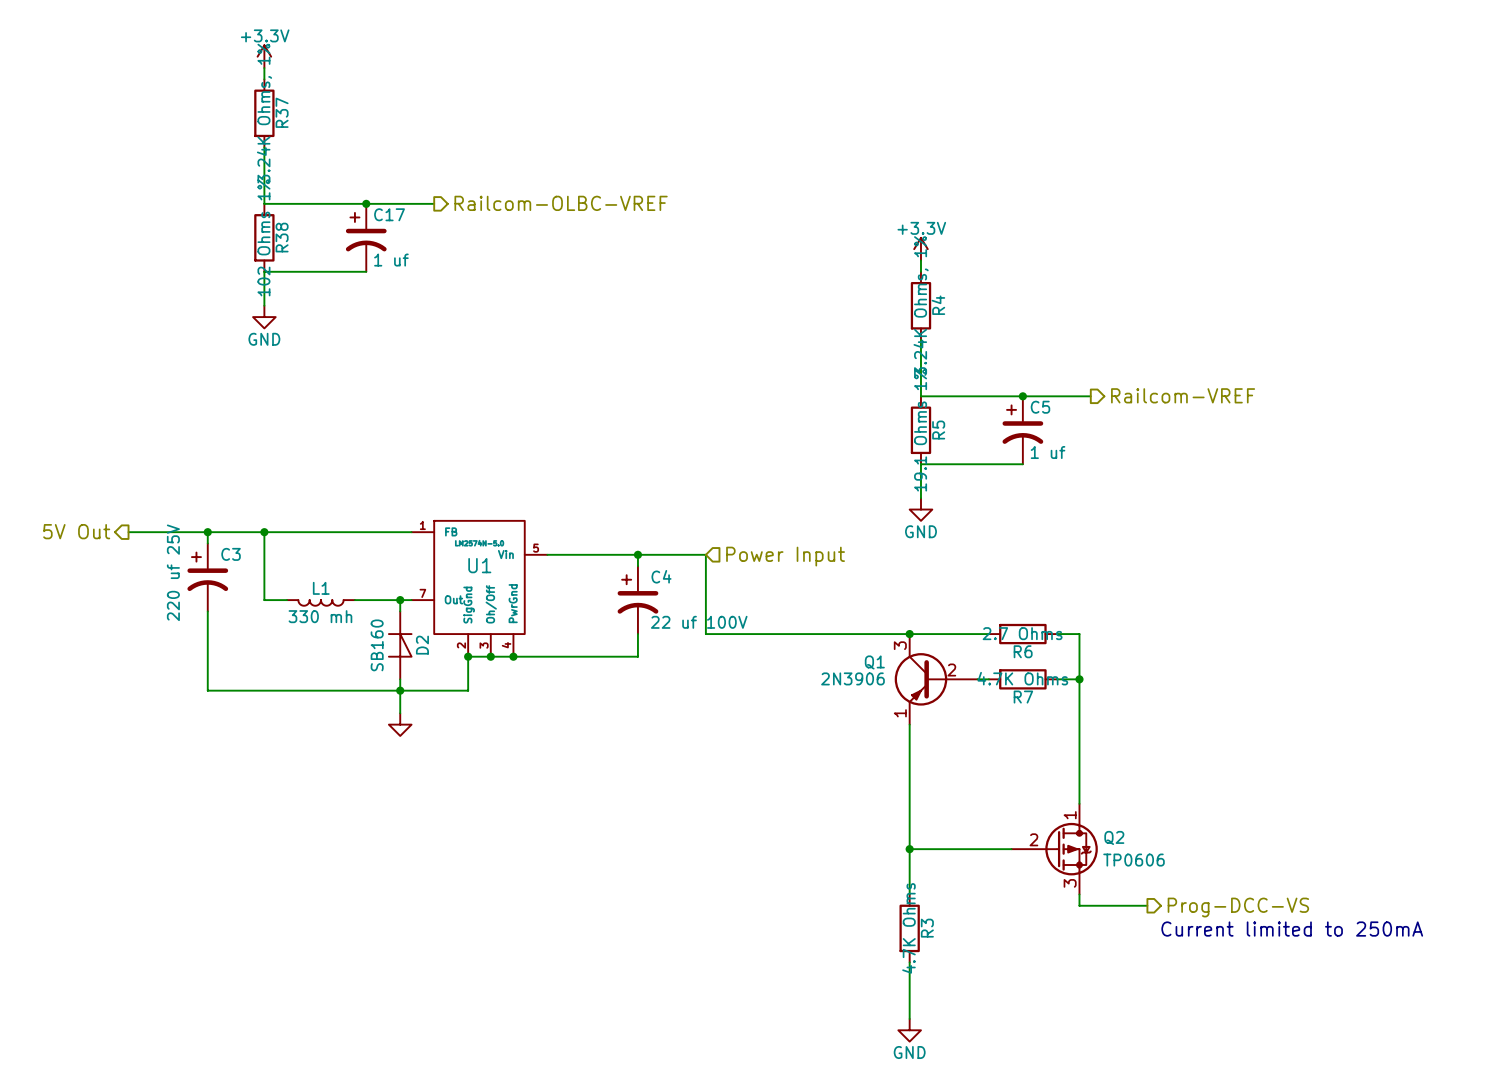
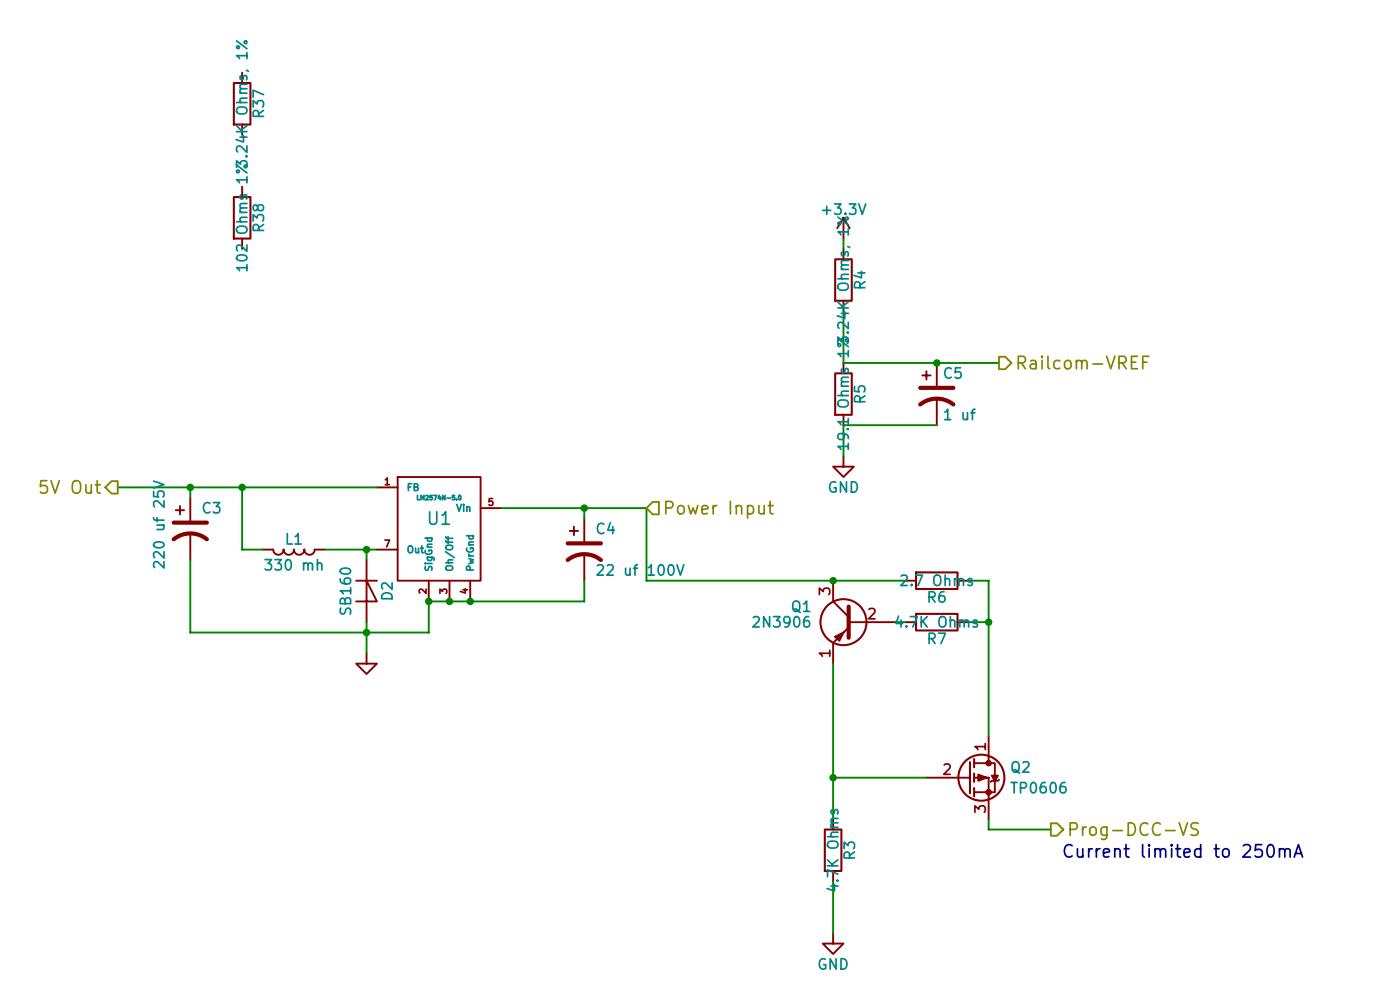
power symbol: +3.3V (264, 56) -> none
wire: (264, 68) (264, 79) -> none
wire: (264, 147) (264, 203) (434, 203) -> none
junction: (366, 203) -> none
hierarchical label: Railcom-OLBC-VREF (561, 203) -> none
C17: 1 uf (366, 237) -> none
wire: (366, 271) (264, 271) (264, 305) -> none
power symbol: GND (264, 317) -> none

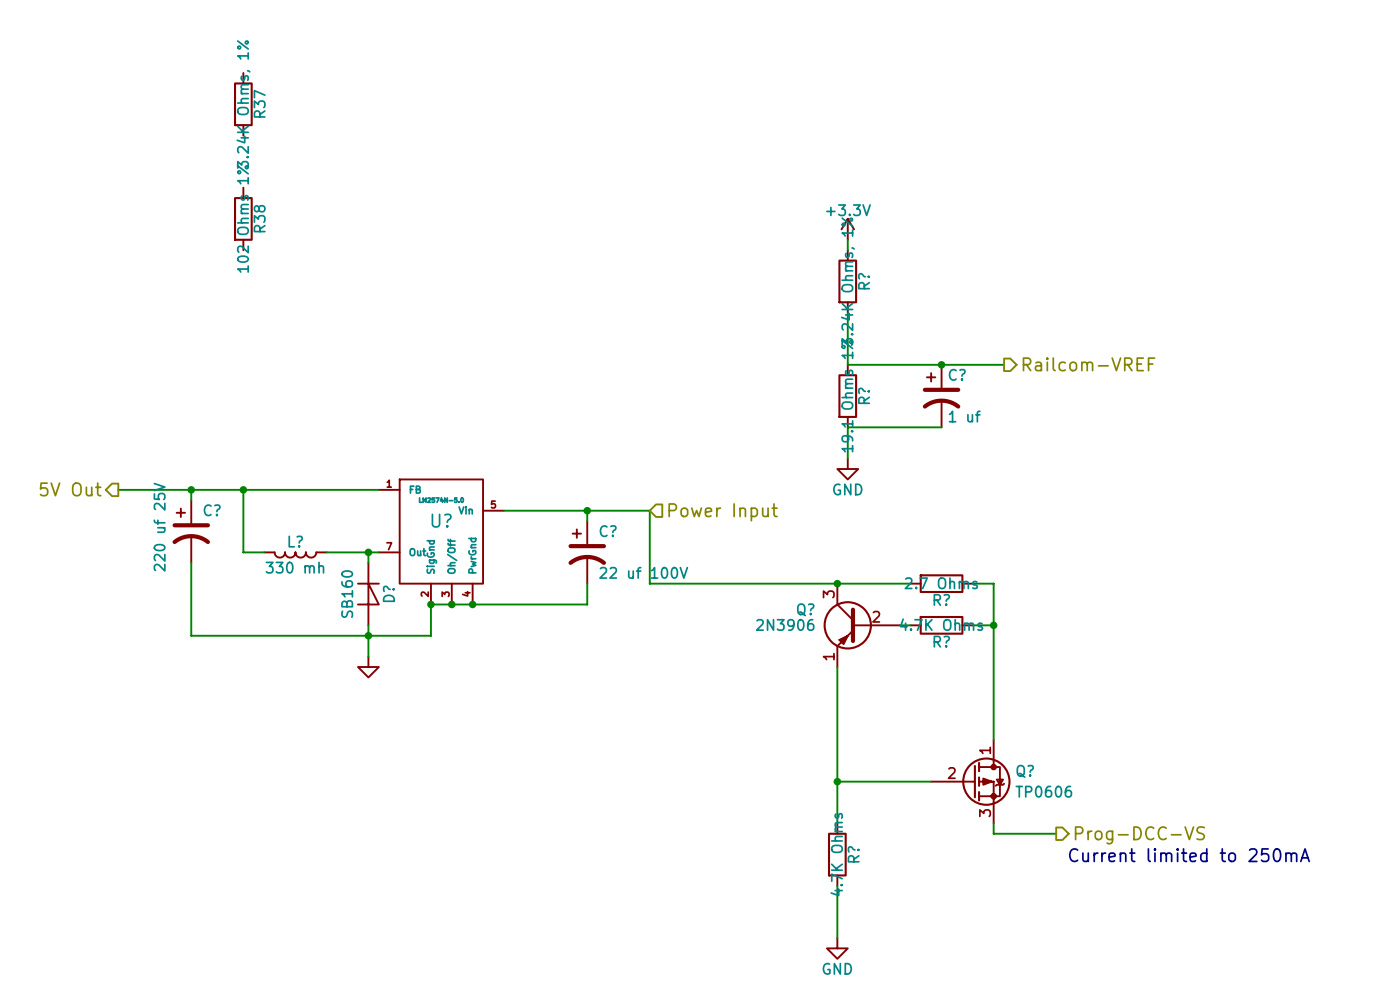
R4 name: R4 (859, 279) -> R? (864, 281)
C5 name: C5 (952, 372) -> C? (957, 374)
R5 name: R5 (859, 393) -> R? (864, 395)
C3 name: C3 (211, 507) -> C? (212, 510)
U1 name: U1 (439, 518) -> U? (441, 520)
C4 name: C4 (605, 528) -> C? (608, 531)
L1 name: L1 (294, 538) -> L? (295, 541)
D2 name: D2 (386, 590) -> D? (388, 593)
R6 name: R6 (937, 596) -> R? (941, 599)
Q1 name: Q1 (801, 606) -> Q? (805, 609)
R7 name: R7 (937, 638) -> R? (941, 641)
Q2 name: Q2 (1020, 767) -> Q? (1025, 771)
R3 name: R3 (849, 850) -> R? (853, 854)

